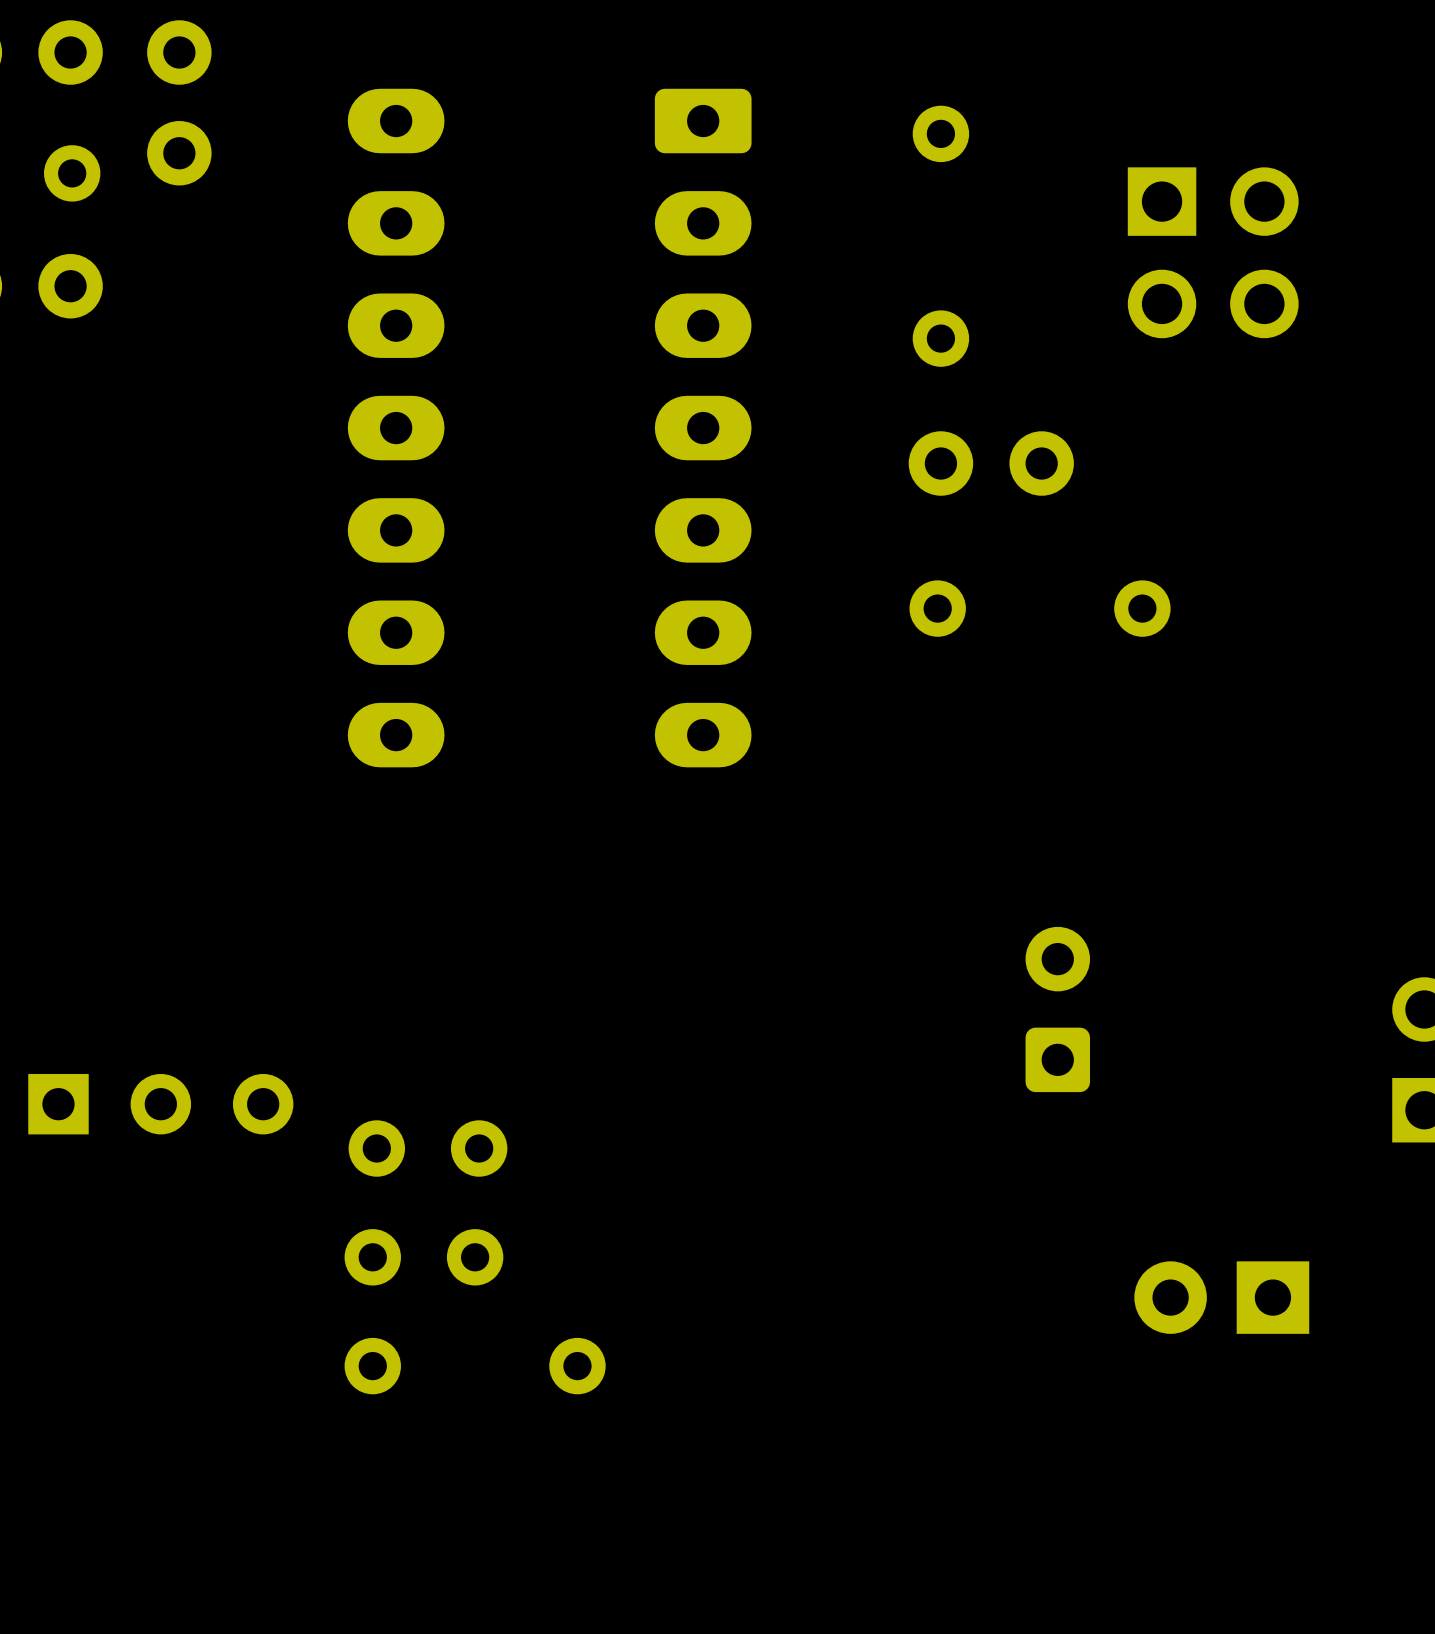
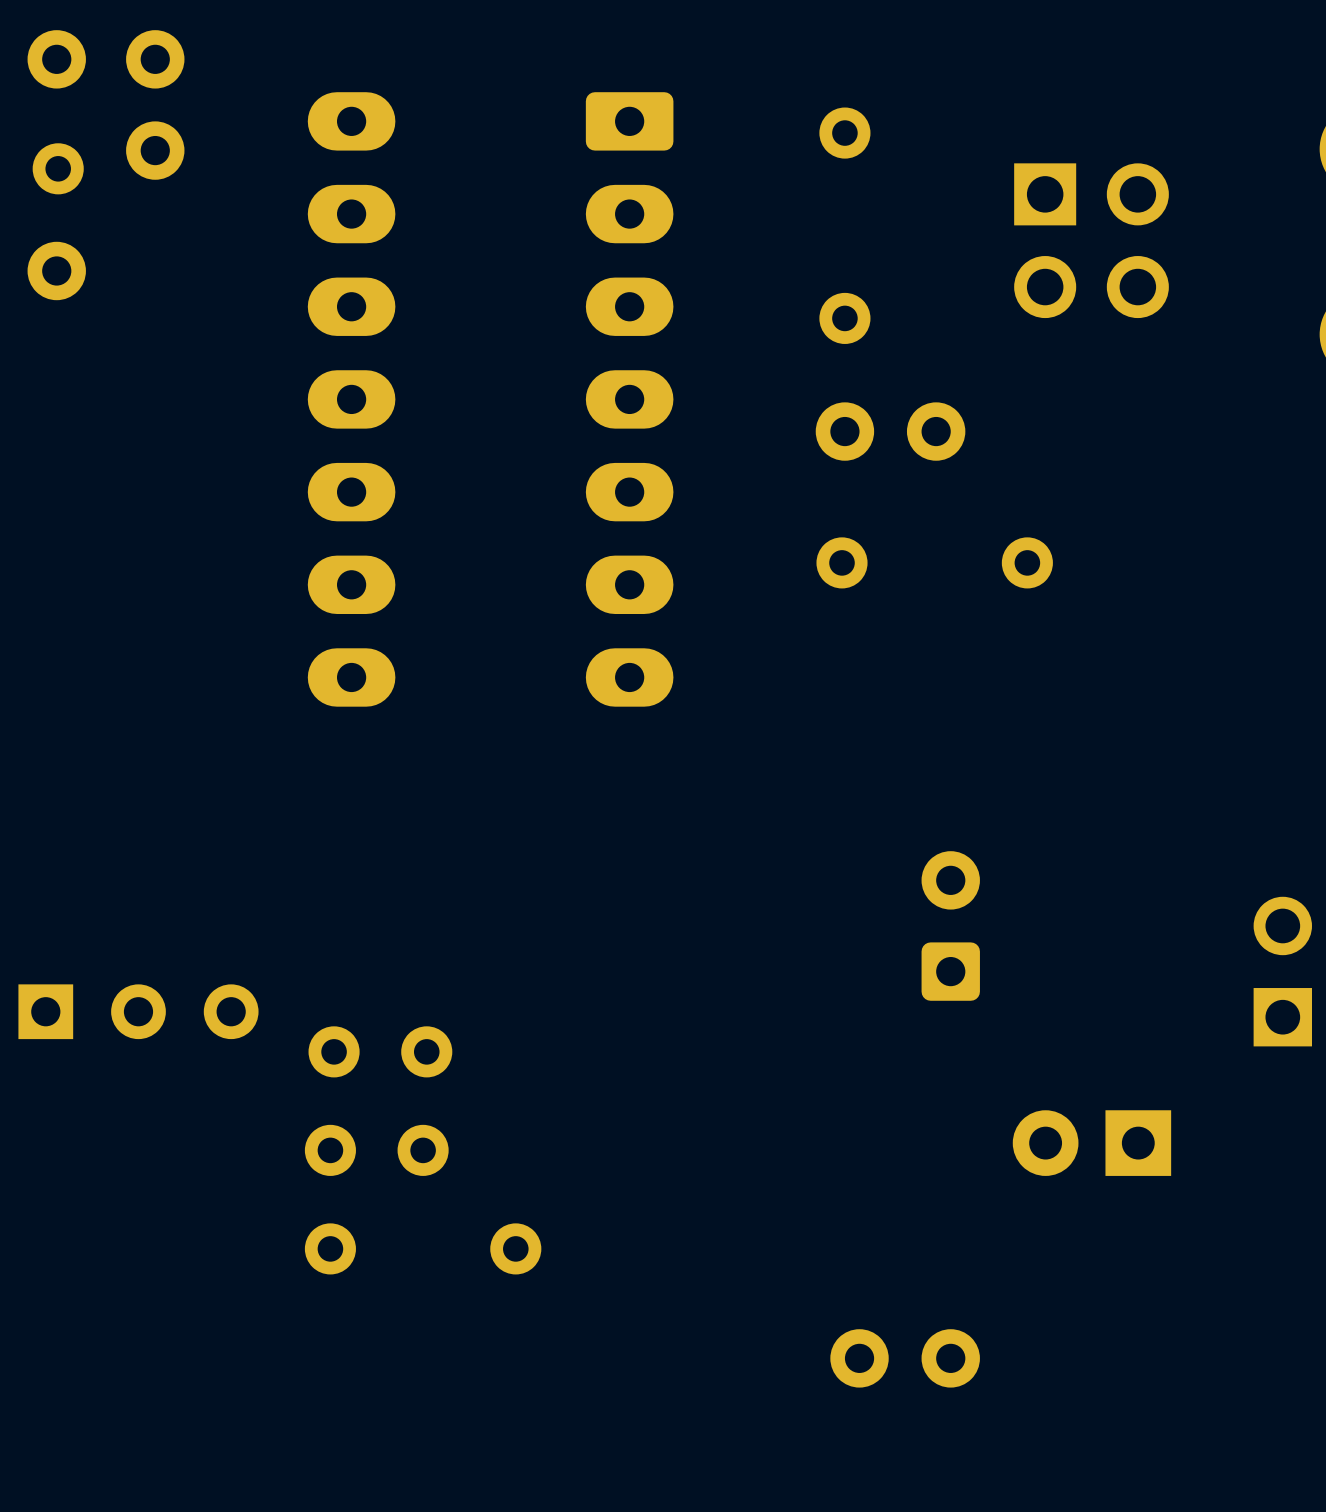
part position: (1221, 1297) -> (1091, 1143)
part: none -> (905, 1358)

